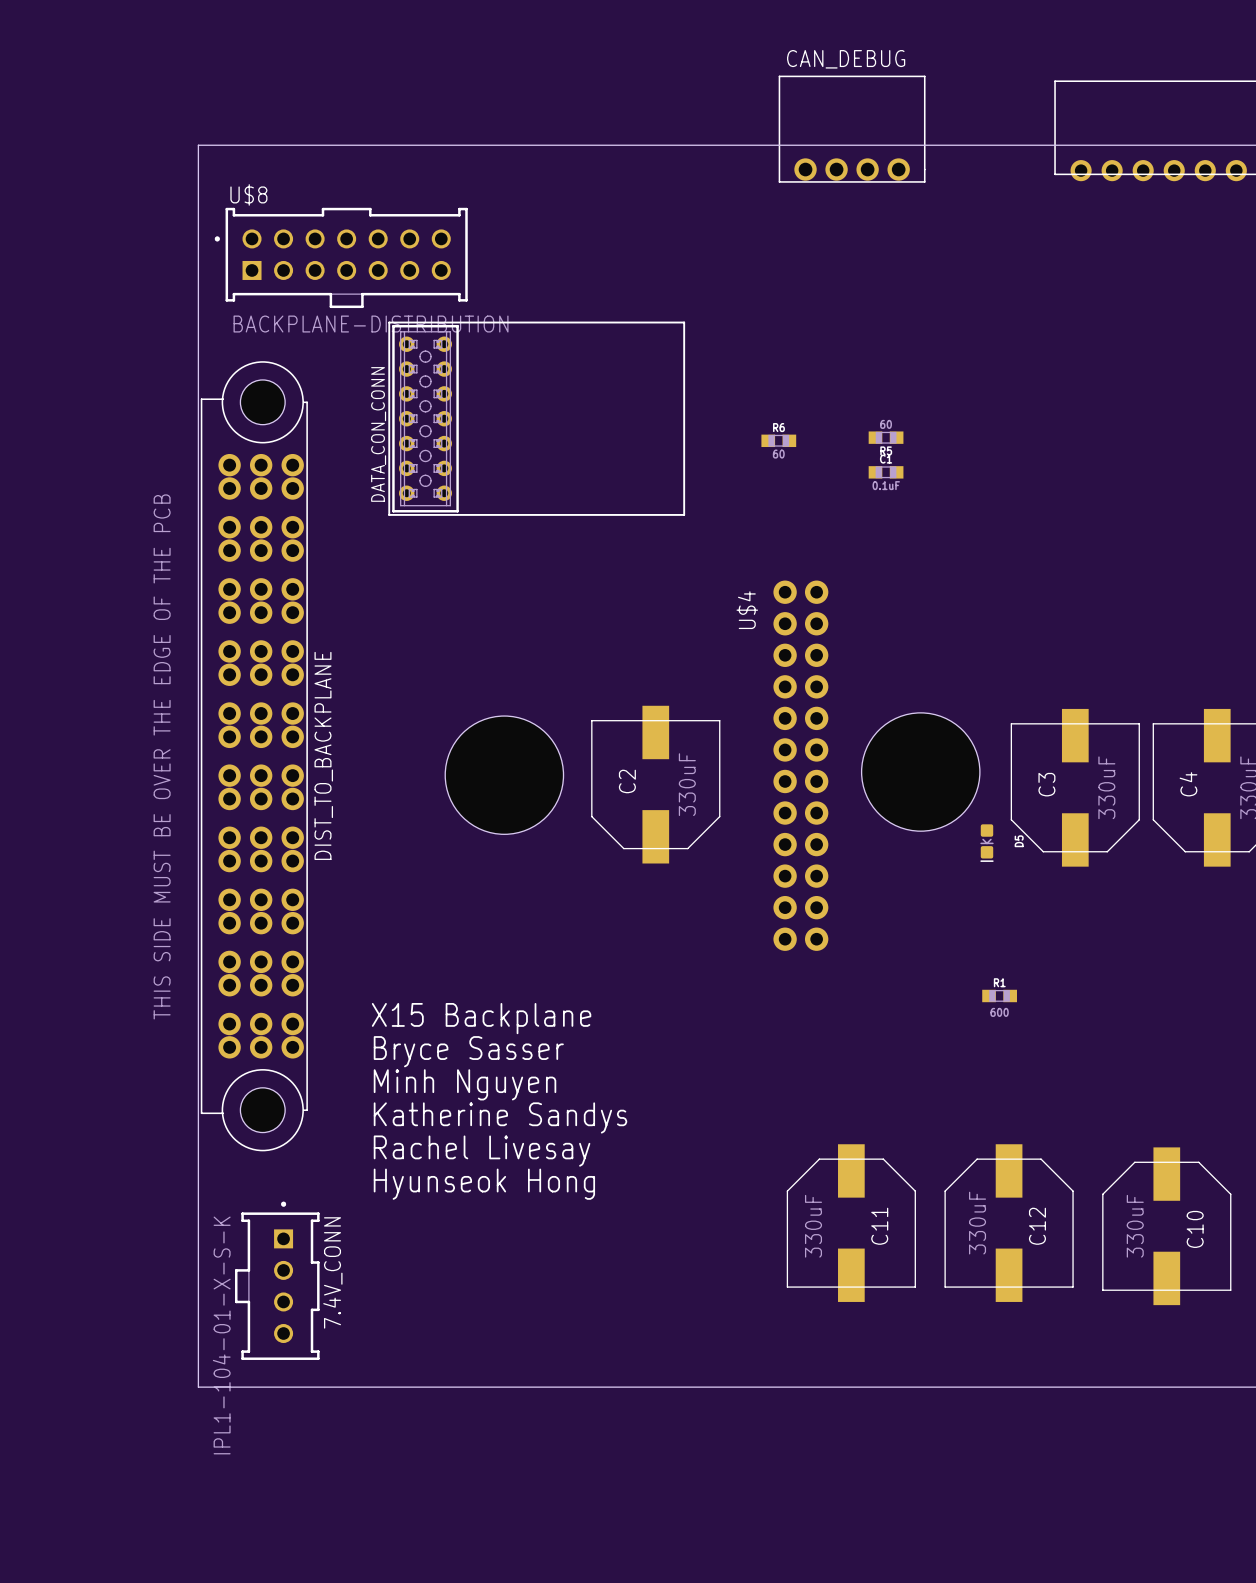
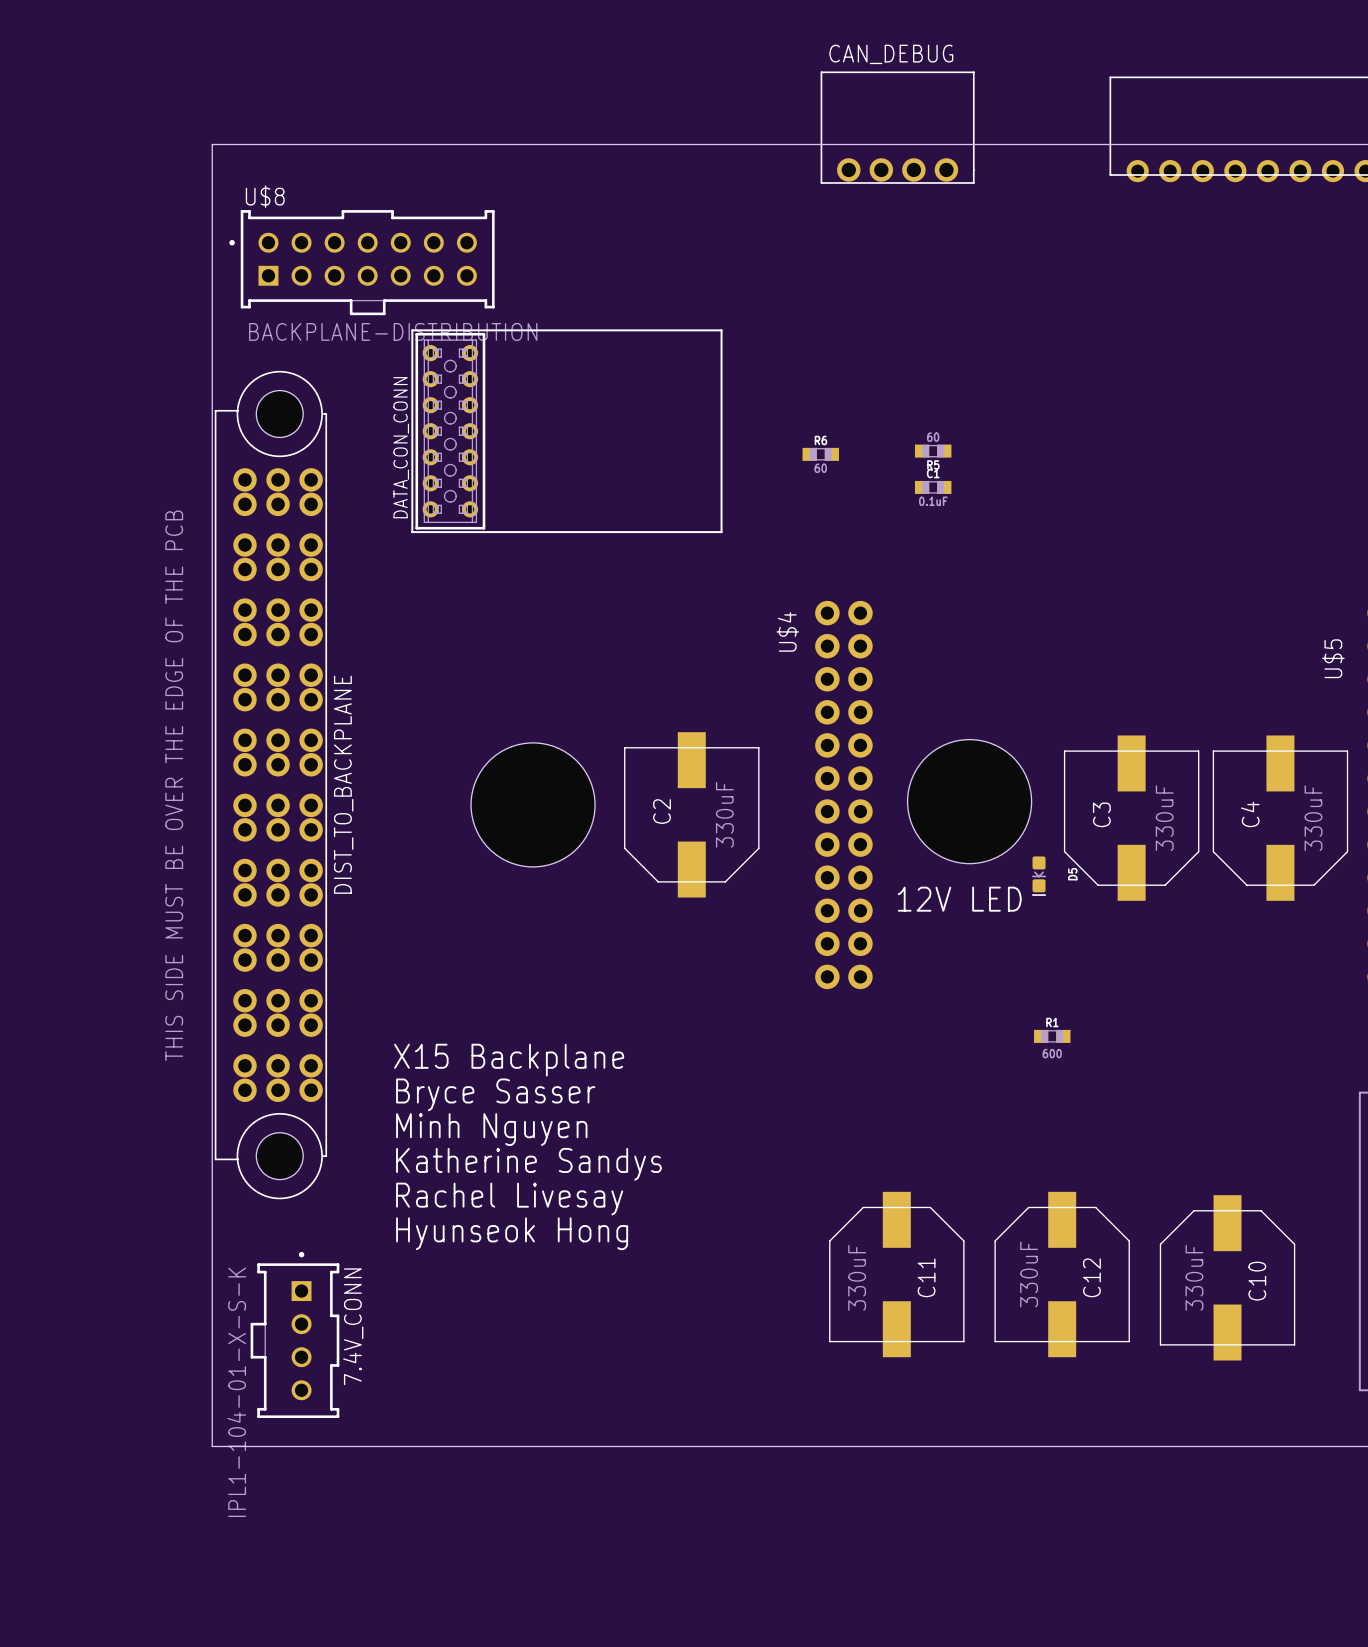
text: none -> 12V LED (959, 899)

